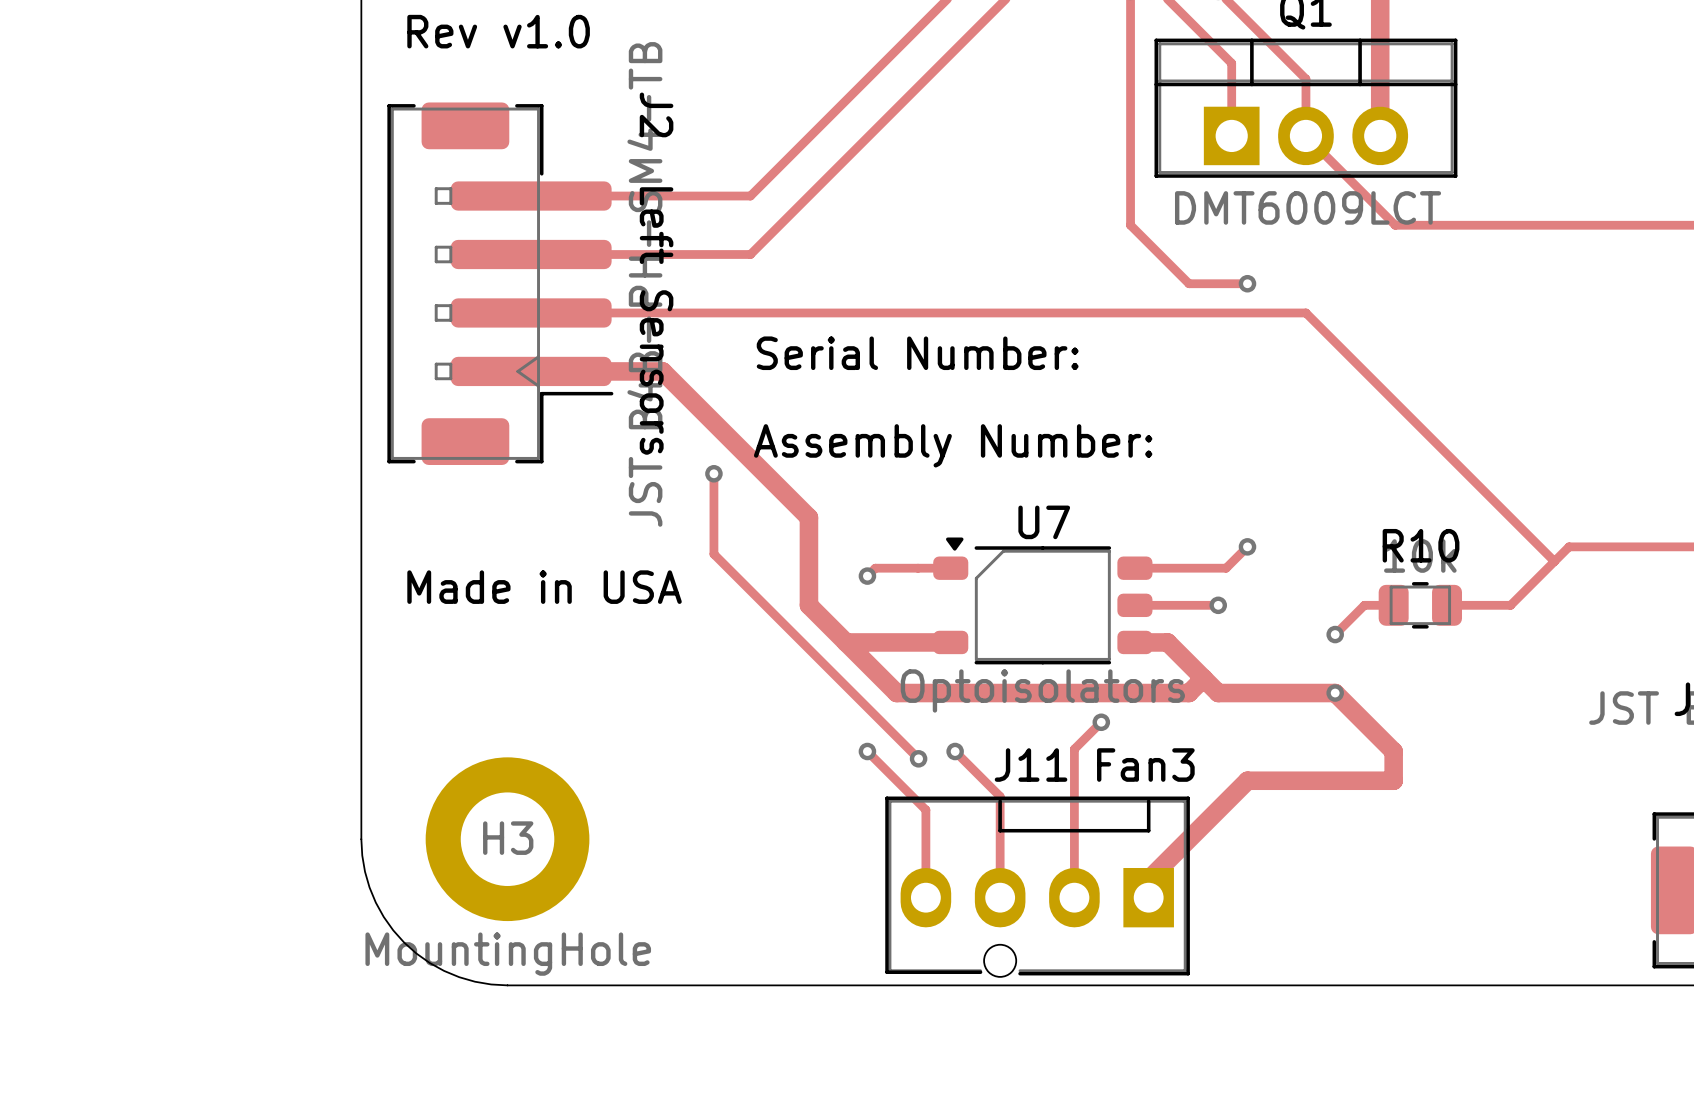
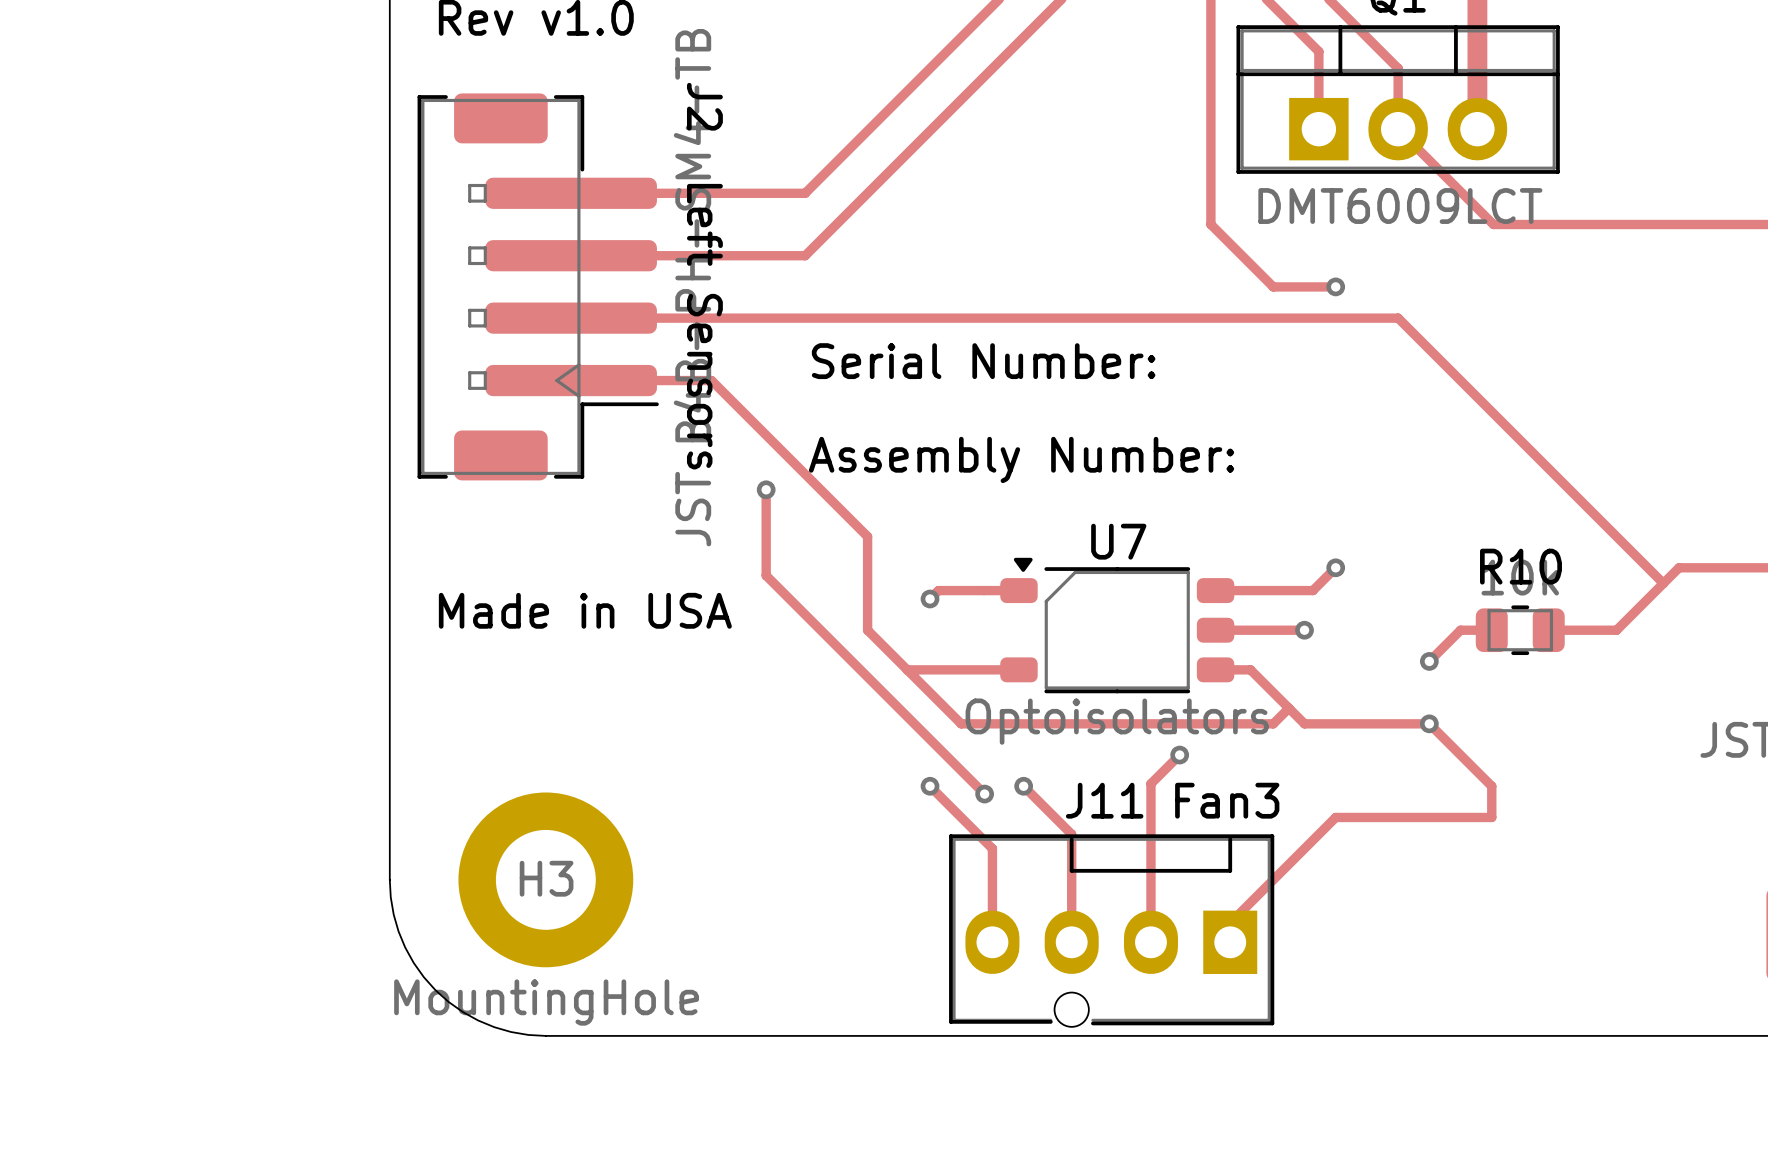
track width: thick (531, 371) (662, 371) (808, 517) (808, 605) (896, 693) (1189, 693) (1203, 678) -> thin (571, 380) (711, 380) (867, 536) (867, 630) (961, 723) (1273, 723) (1288, 708)
track width: thick (846, 642) (950, 642) -> thin (907, 669) (1018, 669)
track width: thick (1134, 642) (1167, 642) (1218, 693) (1335, 693) (1393, 751) (1393, 780) (1247, 780) (1148, 879) (1148, 897) -> thin (1215, 669) (1250, 669) (1304, 723) (1429, 723) (1491, 786) (1491, 817) (1335, 817) (1230, 922) (1230, 942)

